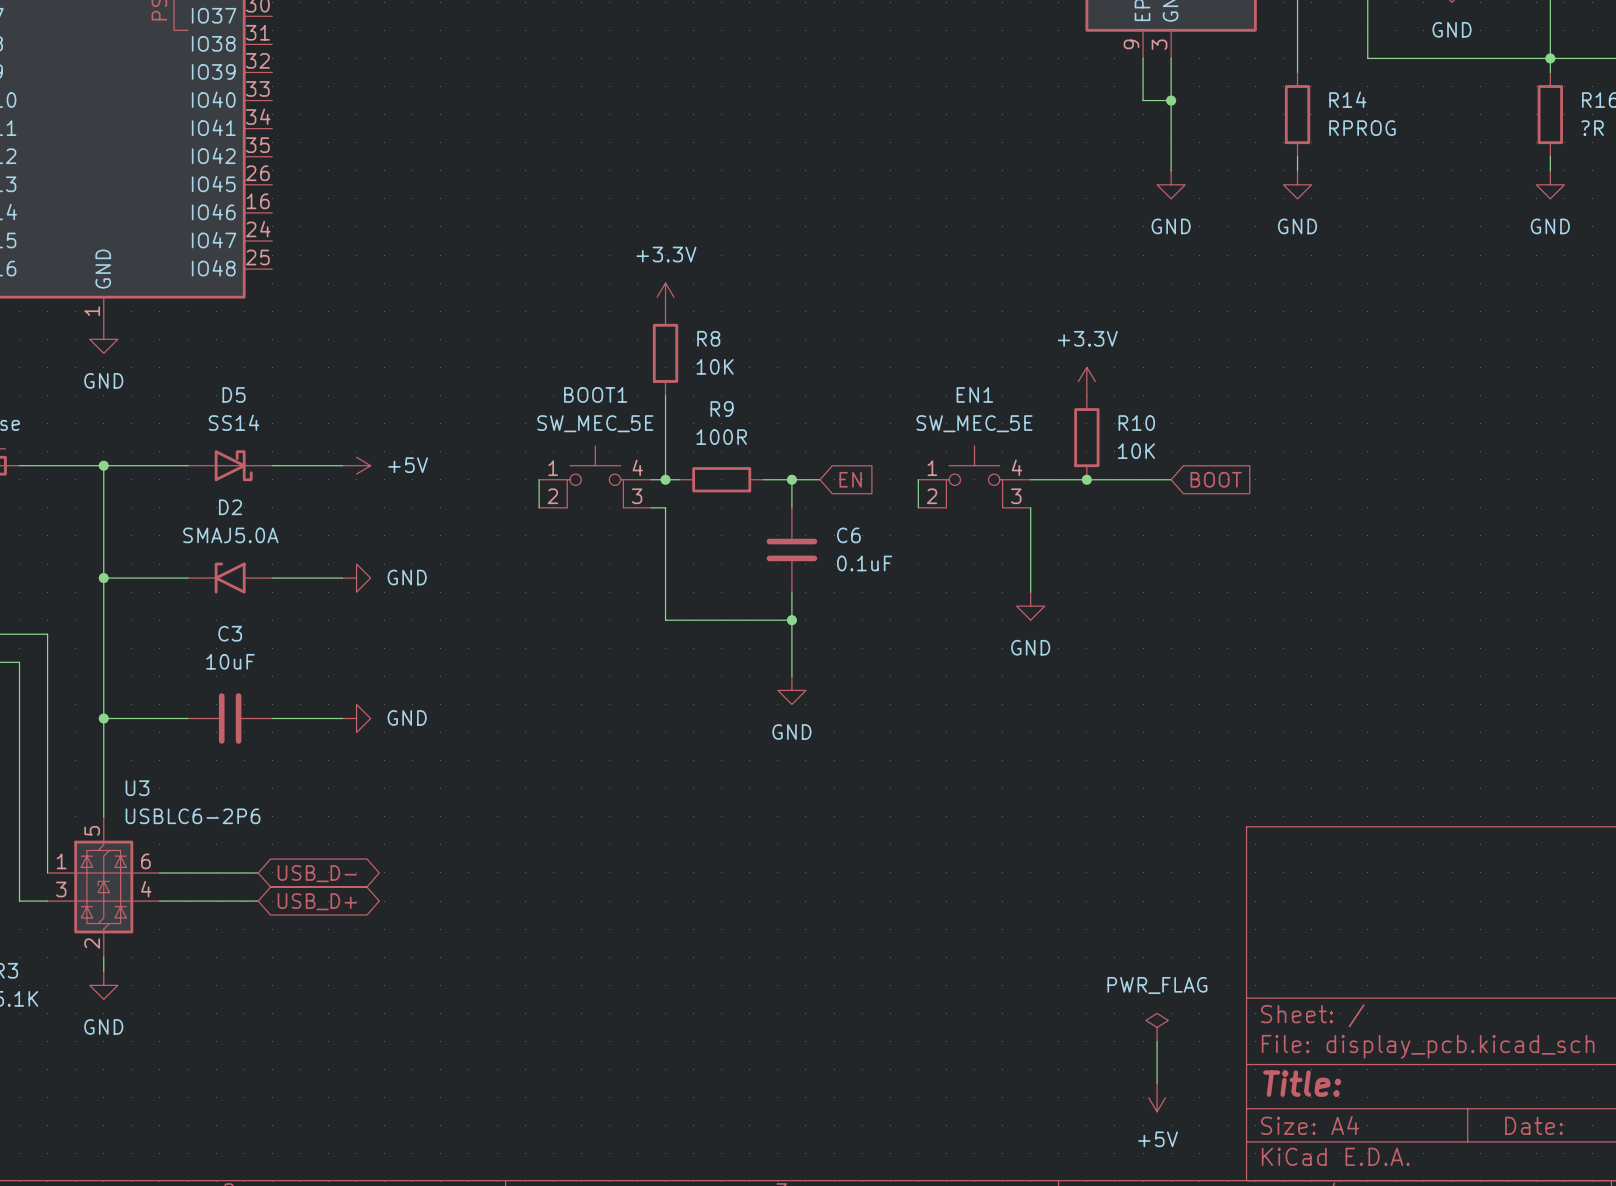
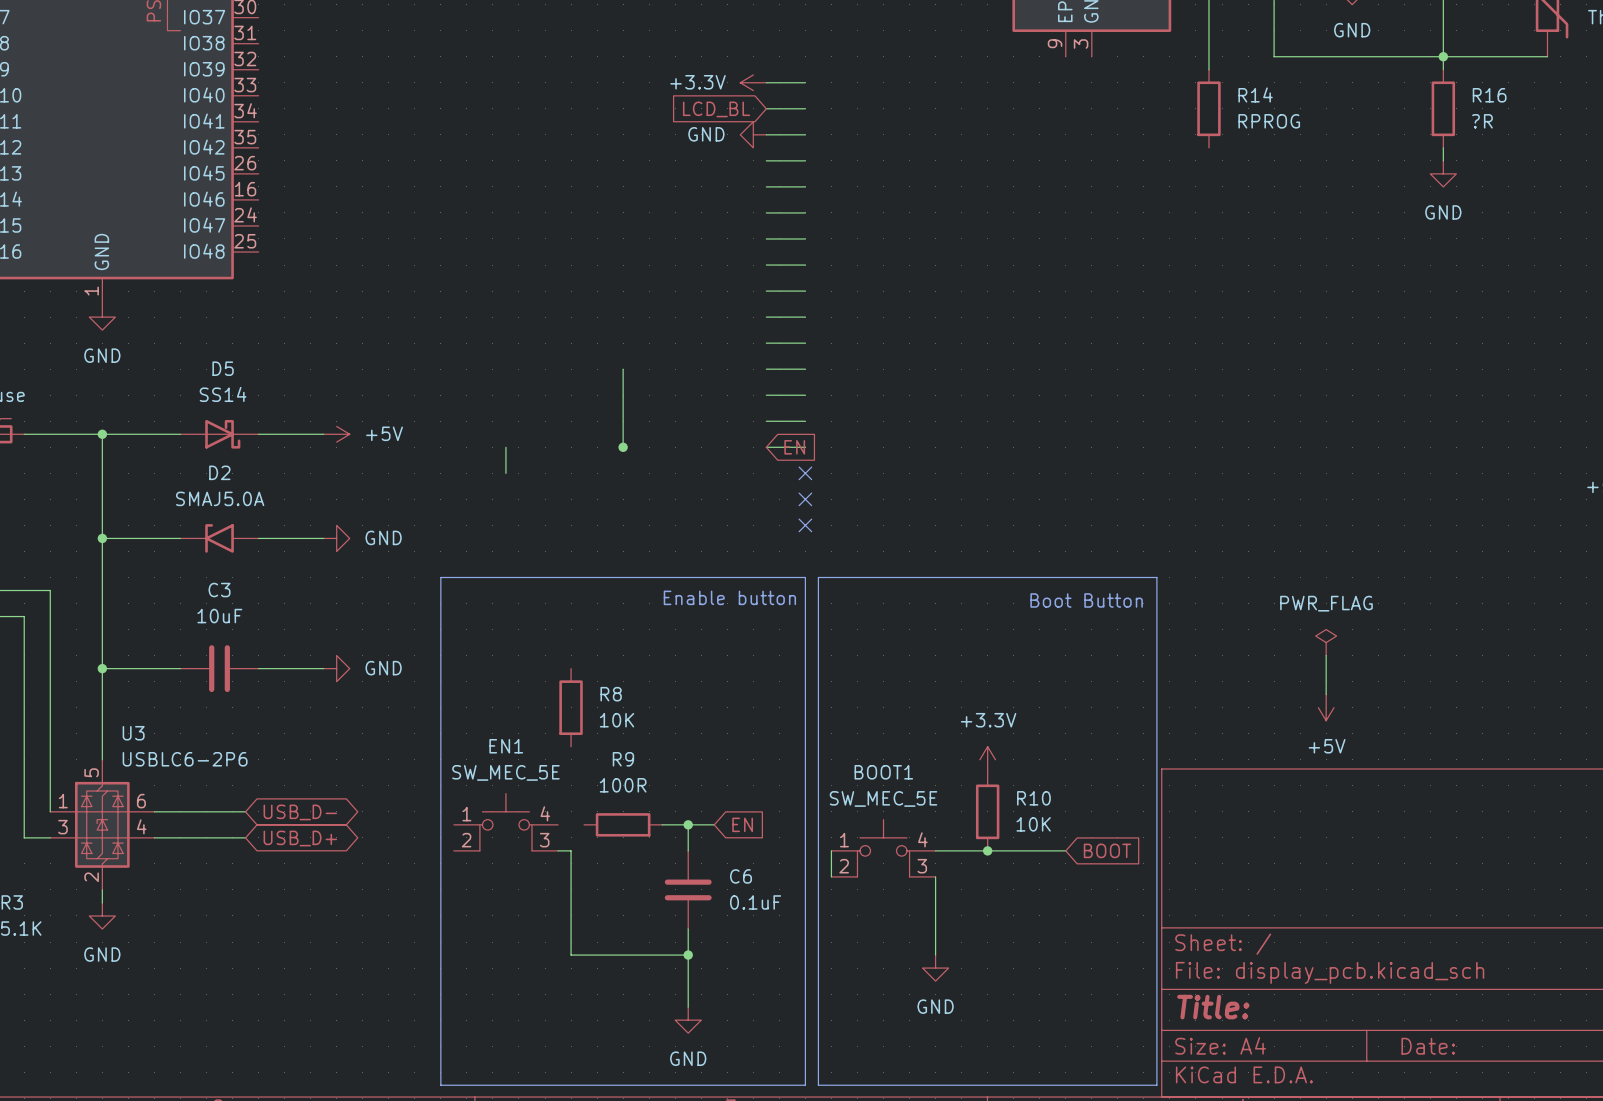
wire: (1143, 58) (1143, 100) (1171, 100) -> none
wire: (1171, 58) (1171, 170) -> none
power symbol: none -> +3.3V (753, 82)
wire: none -> (766, 82) (805, 82)
junction: (1171, 100) -> none
wire: none -> (766, 108) (805, 108)
global label: none -> LCD_BL (716, 109)
power symbol: none -> GND (753, 134)
wire: none -> (766, 134) (805, 134)
wire: (1297, 156) (1297, 170) -> none
wire: none -> (766, 160) (805, 160)
power symbol: GND (1171, 184) -> none
power symbol: GND (1297, 184) -> none
wire: none -> (766, 186) (805, 186)
wire: none -> (766, 212) (805, 212)
wire: none -> (766, 238) (805, 238)
wire: none -> (766, 265) (805, 265)
power symbol: +3.3V (665, 297) -> none
wire: none -> (766, 291) (805, 291)
wire: none -> (766, 317) (805, 317)
R8 position: (665, 353) -> (571, 707)
wire: none -> (766, 343) (805, 343)
power symbol: +3.3V (1086, 381) -> none
wire: none -> (766, 369) (805, 369)
wire: none -> (766, 395) (805, 395)
R10 position: (1086, 437) -> (987, 811)
wire: none -> (766, 421) (805, 421)
BOOT1 position: (595, 476) -> (883, 848)
EN1 position: (974, 476) -> (505, 822)
wire: (651, 479) (679, 479) -> none
R9 position: (721, 479) -> (623, 824)
wire: (763, 479) (820, 479) -> (805, 447) (766, 447)
wire: (791, 479) (791, 507) -> none
junction: (791, 479) -> none
wire: (918, 479) (918, 507) -> none
wire: (1030, 479) (1171, 479) -> none
junction: (1086, 479) -> none
global label: BOOT (1216, 479) -> none
wire: (651, 507) (665, 507) (665, 620) (791, 620) -> none
no-connect mark: none -> (805, 473)
wire: (1030, 507) (1030, 592) -> none
no-connect mark: none -> (805, 499)
C6 position: (791, 549) -> (688, 889)
no-connect mark: none -> (805, 525)
wire: (791, 592) (791, 676) -> none
power symbol: GND (1030, 606) -> none
line: none -> (440, 577) (805, 577) (805, 1085) (440, 1085) (440, 577)
junction: (791, 620) -> none
line: none -> (818, 577) (1156, 577) (1156, 1085) (818, 1085) (818, 577)
text: none -> Enable button (729, 597)
text: none -> Boot Button (1086, 600)
power symbol: GND (791, 690) -> none
power symbol: none -> PWR_FLAG (1326, 642)
wire: none -> (1326, 655) (1326, 694)
power symbol: none -> +5V (1326, 707)
power symbol: none -> +3.3V (987, 759)
wire: none -> (662, 824) (714, 824)
wire: none -> (688, 824) (688, 850)
junction: none -> (688, 824)
global label: none -> EN (742, 824)
wire: none -> (558, 850) (571, 850) (571, 955) (688, 955)
wire: none -> (831, 850) (831, 876)
wire: none -> (935, 850) (1065, 850)
junction: none -> (987, 850)
global label: none -> BOOT (1107, 850)
wire: none -> (935, 876) (935, 955)
wire: none -> (688, 929) (688, 1007)
junction: none -> (688, 955)
power symbol: PWR_FLAG (1157, 1027) -> none
power symbol: none -> GND (935, 968)
wire: (1157, 1041) (1157, 1083) -> none
power symbol: none -> GND (688, 1020)
power symbol: +5V (1157, 1097) -> none

